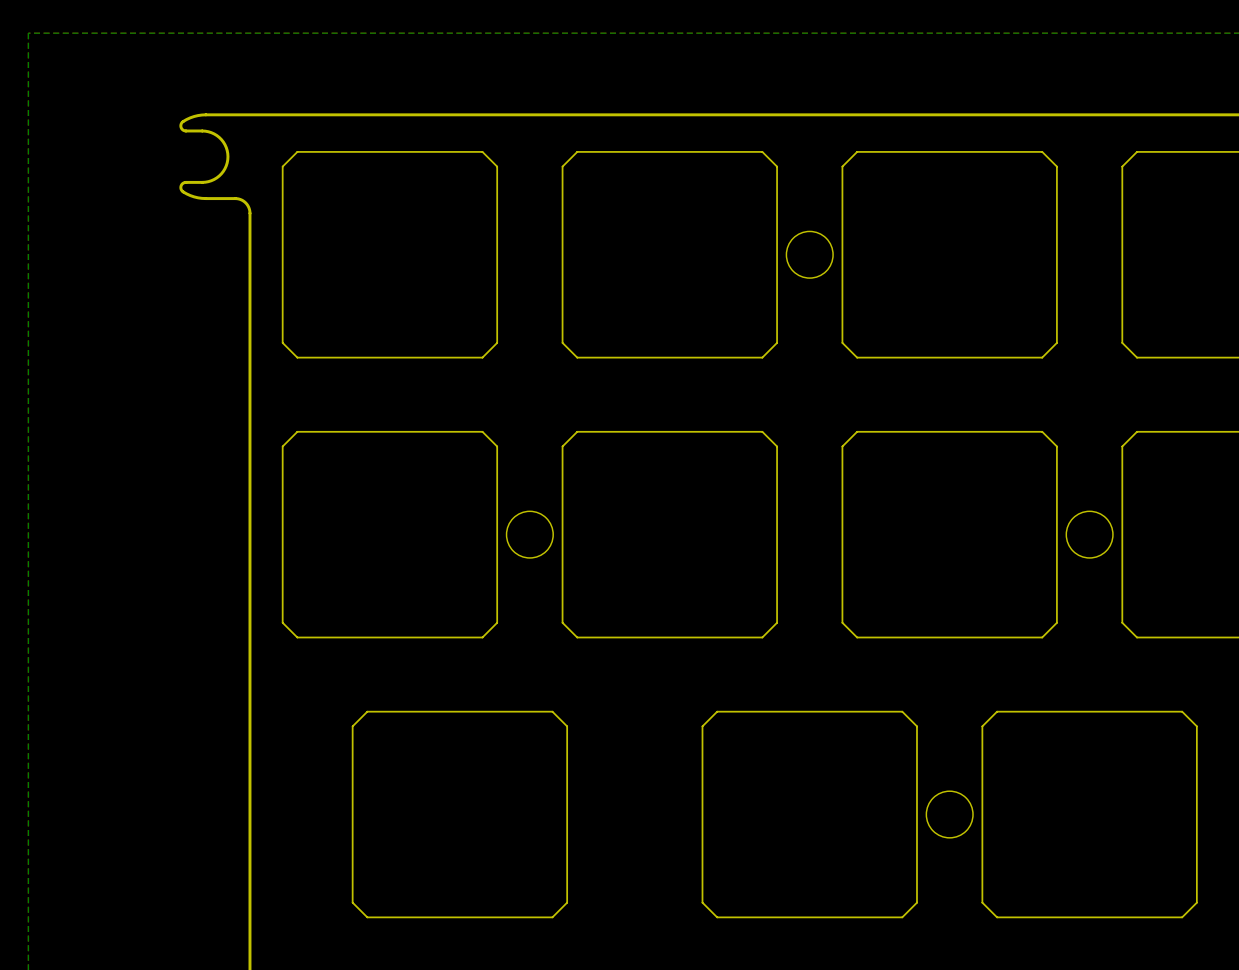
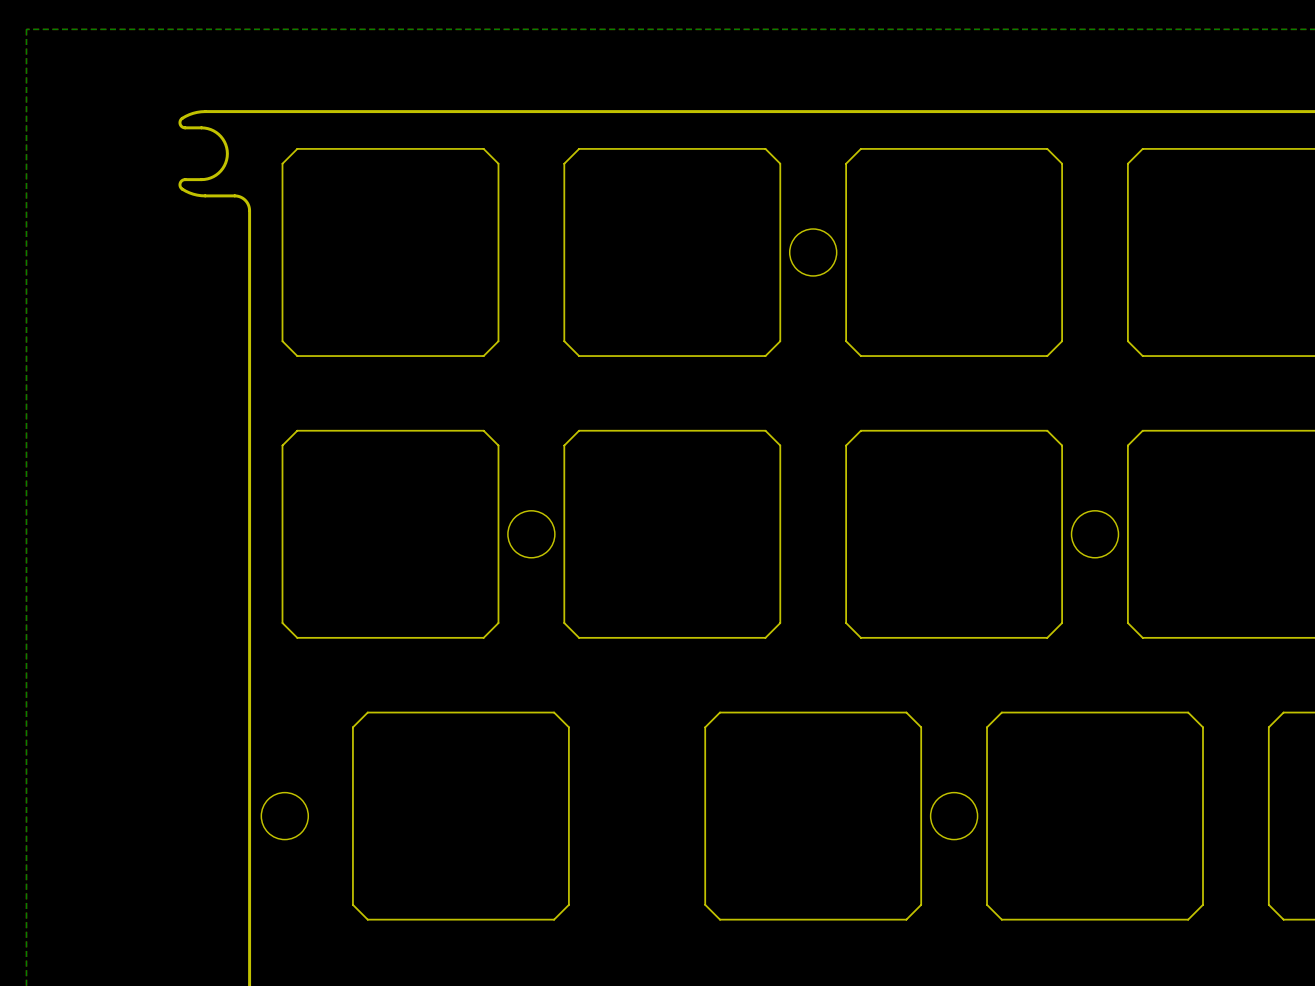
round board edge: none -> [260, 791, 310, 841]

